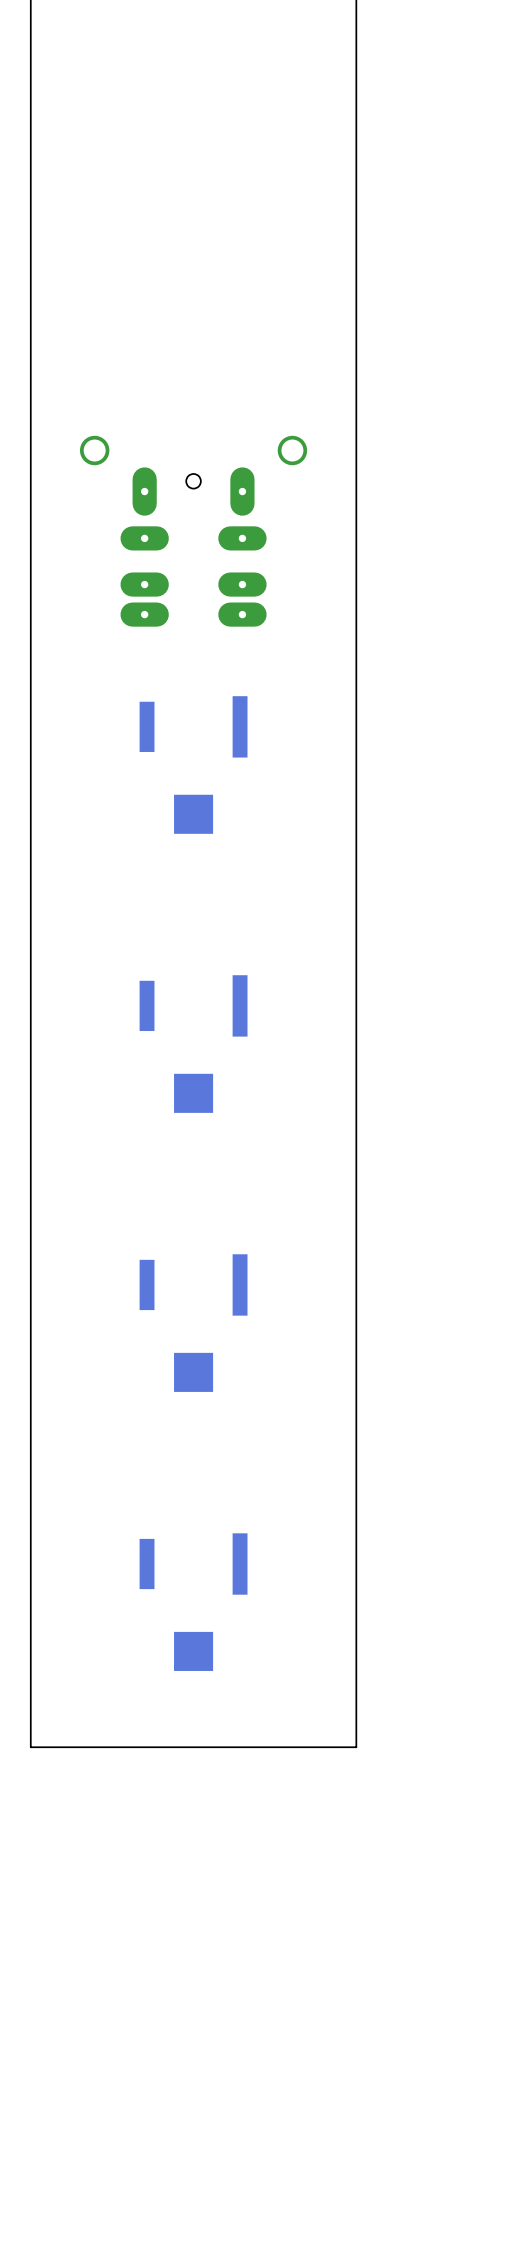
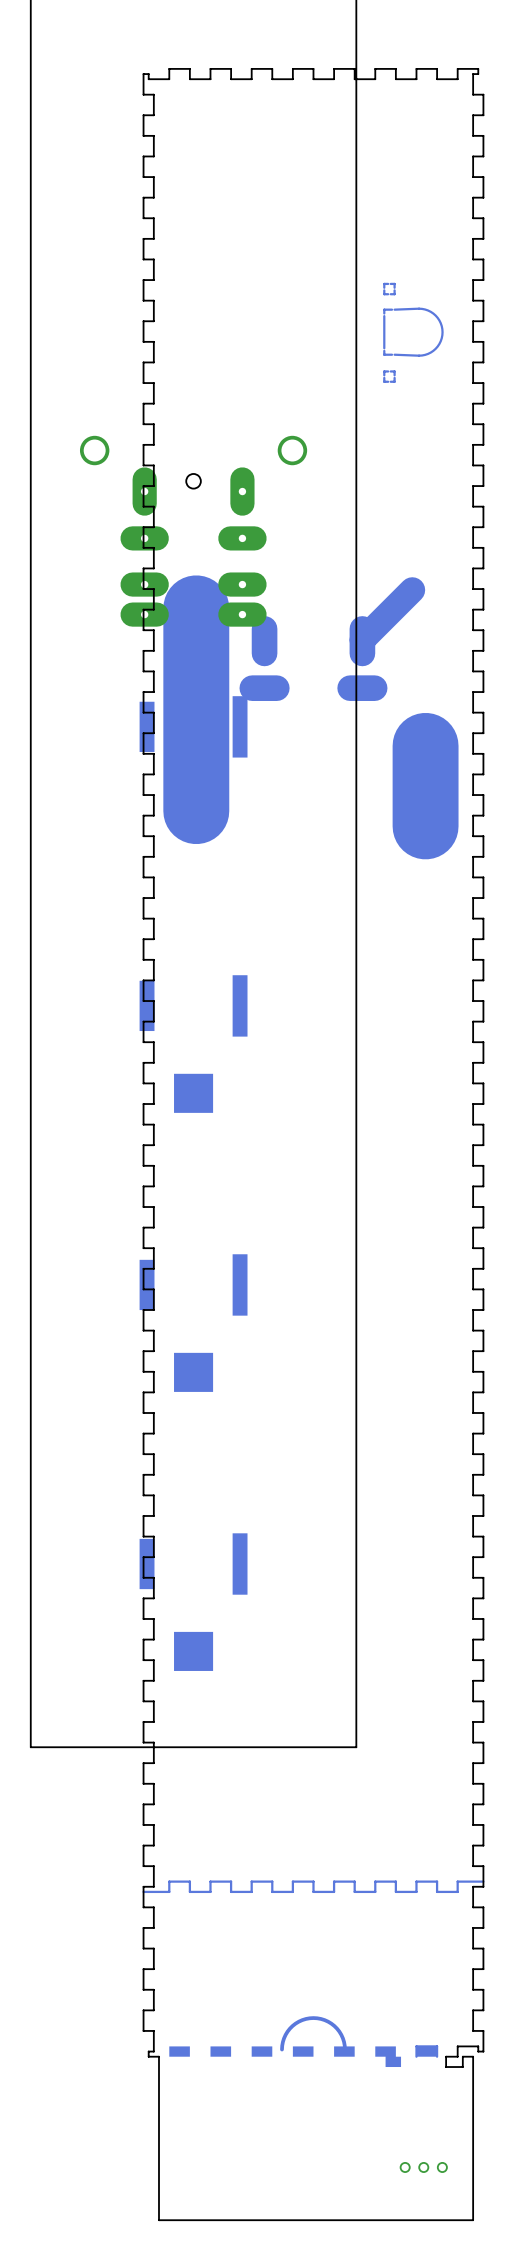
board edge: none -> (478, 68) (457, 68) (457, 79) (437, 79) (437, 68) (416, 68) (416, 79) (395, 79) (395, 68) (375, 68) (375, 79) (354, 79) (354, 68) (334, 68) (334, 79) (313, 79) (313, 68) (292, 68) (292, 79) (272, 79) (272, 68) (251, 68) (251, 79) (231, 79) (231, 68) (210, 68) (210, 79) (189, 79) (189, 68) (169, 68) (169, 79) (148, 79) (148, 74) (143, 74) (143, 94) (153, 94) (153, 115) (143, 115) (143, 135) (153, 135) (153, 156) (143, 156) (143, 177) (153, 177) (153, 197) (143, 197) (143, 218) (153, 218) (153, 238) (143, 238) (143, 259) (153, 259) (153, 280) (143, 280) (143, 300) (153, 300) (153, 321) (143, 321) (143, 341) (153, 341) (153, 362) (143, 362) (143, 383) (153, 383) (153, 403) (143, 403) (143, 424) (153, 424) (153, 444) (143, 444) (143, 465) (153, 465) (153, 486) (143, 486) (143, 506) (153, 506) (153, 527) (143, 527) (143, 547) (153, 547) (153, 568) (143, 568) (143, 589) (153, 589) (153, 609) (143, 609) (143, 630) (153, 630) (153, 650) (143, 650) (143, 671) (153, 671) (153, 692) (143, 692) (143, 712) (153, 712) (153, 733) (143, 733) (143, 753) (153, 753) (153, 774) (143, 774) (143, 795) (153, 795) (153, 815) (143, 815) (143, 836) (153, 836) (153, 856) (143, 856) (143, 877) (153, 877) (153, 898) (143, 898) (143, 918) (153, 918) (153, 939) (143, 939) (143, 959) (153, 959) (153, 980) (143, 980) (143, 1001) (153, 1001) (153, 1021) (143, 1021) (143, 1042) (153, 1042) (153, 1062) (143, 1062) (143, 1083) (153, 1083) (153, 1104) (143, 1104) (143, 1124) (153, 1124) (153, 1145) (143, 1145) (143, 1165) (153, 1165) (153, 1186) (143, 1186) (143, 1207) (153, 1207) (153, 1227) (143, 1227) (143, 1248) (153, 1248) (153, 1268) (143, 1268) (143, 1289) (153, 1289) (153, 1310) (143, 1310) (143, 1330) (153, 1330) (153, 1351) (143, 1351) (143, 1371) (153, 1371) (153, 1392) (143, 1392) (143, 1412) (153, 1412) (153, 1433) (143, 1433) (143, 1454) (153, 1454) (153, 1474) (143, 1474) (143, 1495) (153, 1495) (153, 1515) (143, 1515) (143, 1536) (153, 1536) (153, 1557) (143, 1557) (143, 1577) (153, 1577) (153, 1598) (143, 1598) (143, 1618) (153, 1618) (153, 1639) (143, 1639) (143, 1660) (153, 1660) (153, 1680) (143, 1680) (143, 1701) (153, 1701) (153, 1721) (143, 1721) (143, 1742) (153, 1742) (153, 1763) (143, 1763) (143, 1783) (153, 1783) (153, 1804) (143, 1804) (143, 1824) (153, 1824) (153, 1845) (143, 1845) (143, 1866) (153, 1866) (153, 1886) (143, 1886) (143, 1907) (153, 1907) (153, 1927) (143, 1927) (143, 1948) (153, 1948) (153, 1969) (143, 1969) (143, 1989) (153, 1989) (153, 2010) (143, 2010) (143, 2030) (153, 2030) (153, 2051) (148, 2051) (148, 2056) (158, 2056) (158, 2220) (473, 2220) (473, 2056) (462, 2056) (462, 2067) (446, 2067) (446, 2056) (457, 2056) (457, 2046) (478, 2046) (478, 2051) (483, 2051) (483, 2030) (473, 2030) (473, 2010) (483, 2010) (483, 1989) (473, 1989) (473, 1969) (483, 1969) (483, 1948) (473, 1948) (473, 1927) (483, 1927) (483, 1907) (473, 1907) (473, 1886) (483, 1886) (483, 1866) (473, 1866) (473, 1845) (483, 1845) (483, 1824) (473, 1824) (473, 1804) (483, 1804) (483, 1783) (473, 1783) (473, 1763) (483, 1763) (483, 1742) (473, 1742) (473, 1721) (483, 1721) (483, 1701) (473, 1701) (473, 1680) (483, 1680) (483, 1660) (473, 1660) (473, 1639) (483, 1639) (483, 1618) (473, 1618) (473, 1598) (483, 1598) (483, 1577) (473, 1577) (473, 1557) (483, 1557) (483, 1536) (473, 1536) (473, 1515) (483, 1515) (483, 1495) (473, 1495) (473, 1474) (483, 1474) (483, 1454) (473, 1454) (473, 1433) (483, 1433) (483, 1412) (473, 1412) (473, 1392) (483, 1392) (483, 1371) (473, 1371) (473, 1351) (483, 1351) (483, 1330) (473, 1330) (473, 1310) (483, 1310) (483, 1289) (473, 1289) (473, 1268) (483, 1268) (483, 1248) (473, 1248) (473, 1227) (483, 1227) (483, 1207) (473, 1207) (473, 1186) (483, 1186) (483, 1165) (473, 1165) (473, 1145) (483, 1145) (483, 1124) (473, 1124) (473, 1104) (483, 1104) (483, 1083) (473, 1083) (473, 1062) (483, 1062) (483, 1042) (473, 1042) (473, 1021) (483, 1021) (483, 1001) (473, 1001) (473, 980) (483, 980) (483, 959) (473, 959) (473, 939) (483, 939) (483, 918) (473, 918) (473, 898) (483, 898) (483, 877) (473, 877) (473, 856) (483, 856) (483, 836) (473, 836) (473, 815) (483, 815) (483, 795) (473, 795) (473, 774) (483, 774) (483, 753) (473, 753) (473, 733) (483, 733) (483, 712) (473, 712) (473, 692) (483, 692) (483, 671) (473, 671) (473, 650) (483, 650) (483, 630) (473, 630) (473, 609) (483, 609) (483, 589) (473, 589) (473, 568) (483, 568) (483, 547) (473, 547) (473, 527) (483, 527) (483, 506) (473, 506) (473, 486) (483, 486) (483, 465) (473, 465) (473, 444) (483, 444) (483, 424) (473, 424) (473, 403) (483, 403) (483, 383) (473, 383) (473, 362) (483, 362) (483, 341) (473, 341) (473, 321) (483, 321) (483, 300) (473, 300) (473, 280) (483, 280) (483, 259) (473, 259) (473, 238) (483, 238) (483, 218) (473, 218) (473, 197) (483, 197) (483, 177) (473, 177) (473, 156) (483, 156) (483, 135) (473, 135) (473, 115) (483, 115) (483, 94) (473, 94) (473, 74) (478, 74) (478, 68)
track: none -> (388, 283) (384, 283) (384, 287)
track: none -> (390, 283) (394, 283) (394, 287)
track: none -> (384, 290) (384, 294) (388, 294)
track: none -> (394, 290) (394, 294) (390, 294)
track: none -> (392, 309) (384, 309) (384, 313)
track: none -> (394, 309) (419, 308) (428, 310) (439, 320) (442, 332) (439, 343) (428, 353) (419, 355) (394, 354)
track: none -> (384, 316) (384, 348)
track: none -> (384, 350) (384, 354) (392, 354)
track: none -> (388, 371) (384, 371) (384, 375)
track: none -> (390, 371) (394, 371) (394, 375)
track: none -> (384, 377) (384, 381) (388, 381)
track: none -> (394, 377) (394, 381) (390, 381)
track: none -> (412, 590) (362, 640)
track: none -> (196, 608) (196, 811)
track: none -> (264, 628) (264, 653)
track: none -> (362, 628) (362, 653)
track: none -> (276, 688) (252, 688)
track: none -> (374, 688) (350, 688)
track: none -> (414, 734) (425, 745) (425, 826)
track: none -> (483, 1881) (457, 1881) (457, 1891) (437, 1891) (437, 1881) (416, 1881) (416, 1891) (395, 1891) (395, 1881) (375, 1881) (375, 1891) (354, 1891) (354, 1881) (334, 1881) (334, 1891) (313, 1891) (313, 1881) (292, 1881) (292, 1891) (272, 1891) (272, 1881) (251, 1881) (251, 1891) (231, 1891) (231, 1881) (210, 1881) (210, 1891) (189, 1891) (189, 1881) (169, 1881) (169, 1891) (143, 1891)
drawing: none -> [169, 2046, 190, 2057]
drawing: none -> [210, 2046, 232, 2057]
drawing: none -> [251, 2046, 273, 2057]
drawing: none -> [292, 2046, 314, 2057]
drawing: none -> [334, 2046, 355, 2057]
drawing: none -> [375, 2046, 402, 2068]
drawing: none -> [416, 2046, 438, 2057]
track: none -> (344, 2049) (342, 2038) (337, 2028) (328, 2021) (313, 2018) (298, 2021) (289, 2028) (284, 2038) (281, 2049)
track: none -> (437, 2056) (437, 2046) (416, 2046) (416, 2056)
via: none -> (405, 2167)
via: none -> (423, 2167)
via: none -> (442, 2167)

